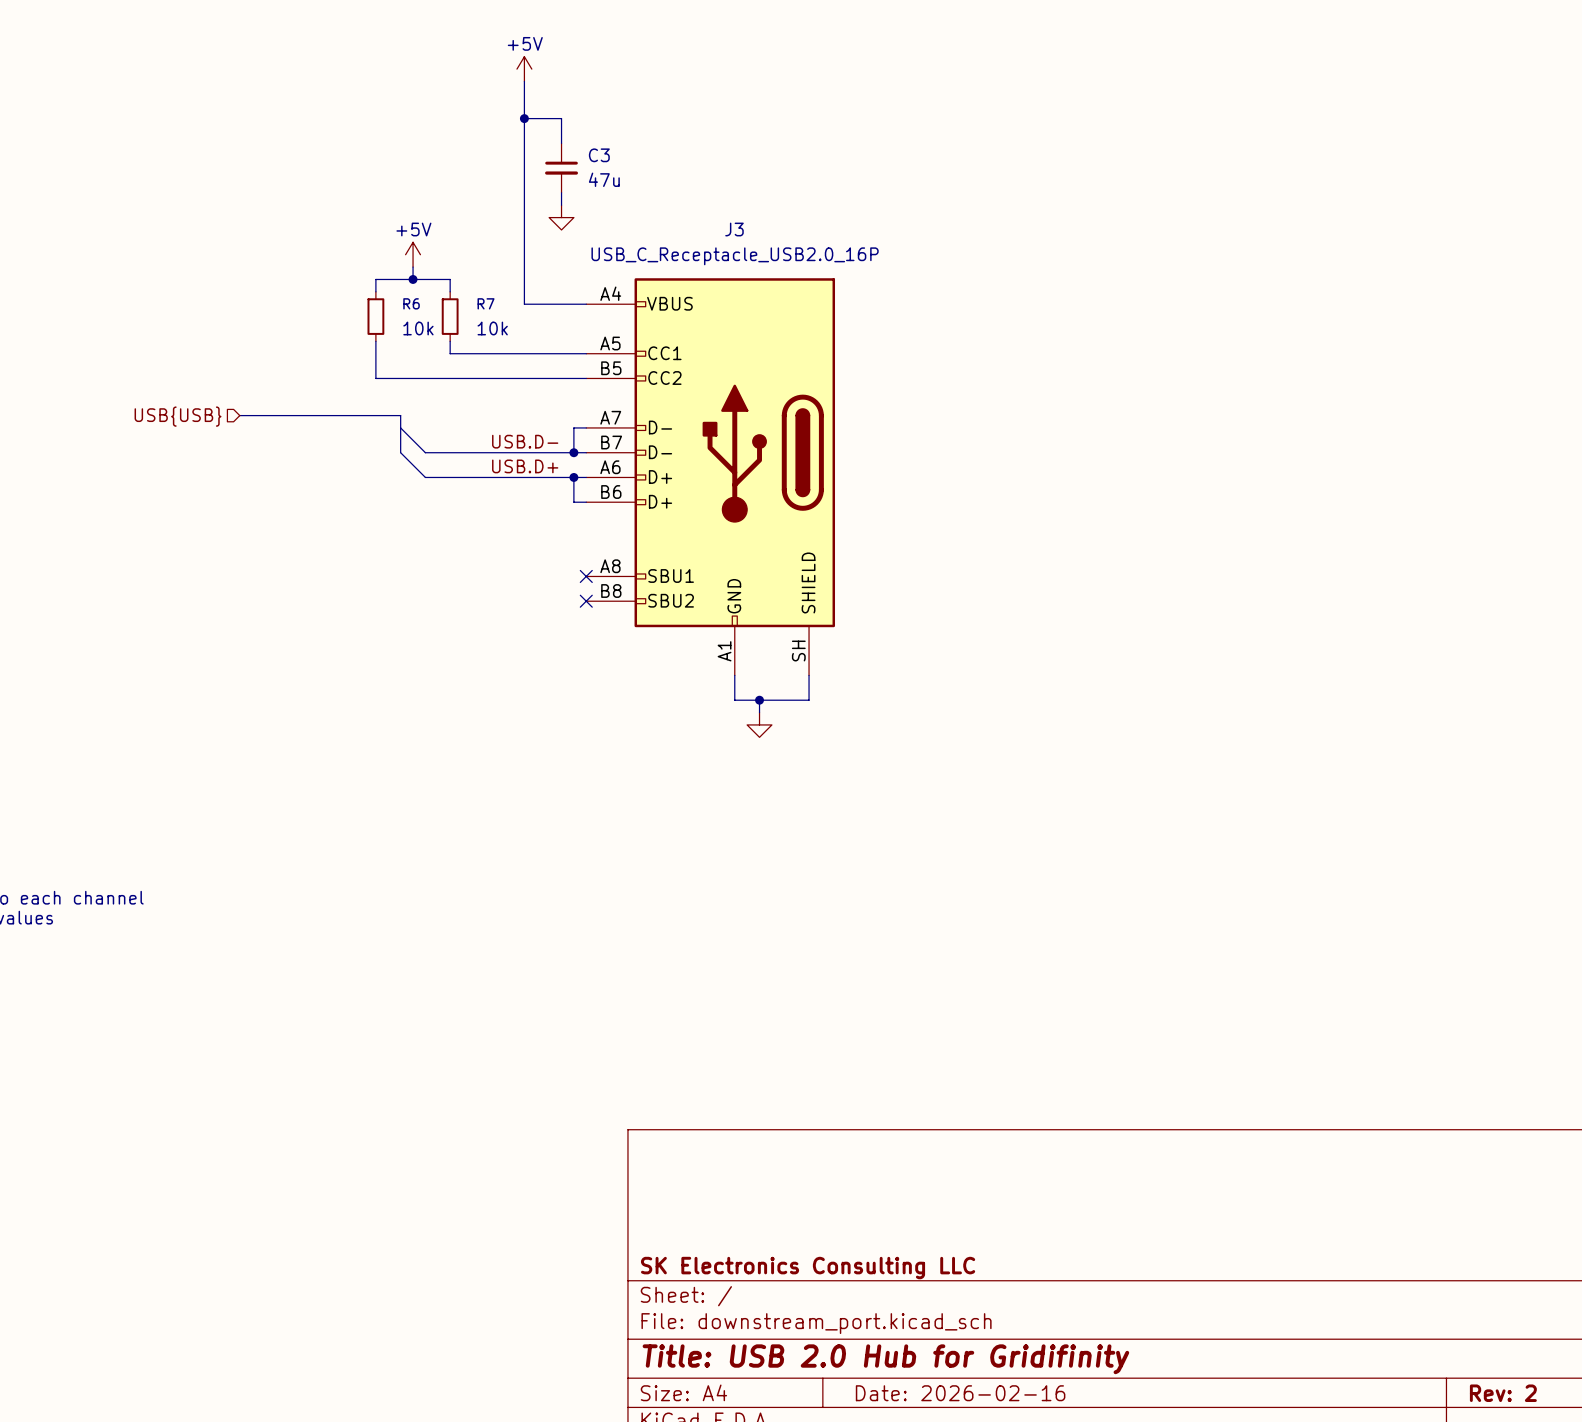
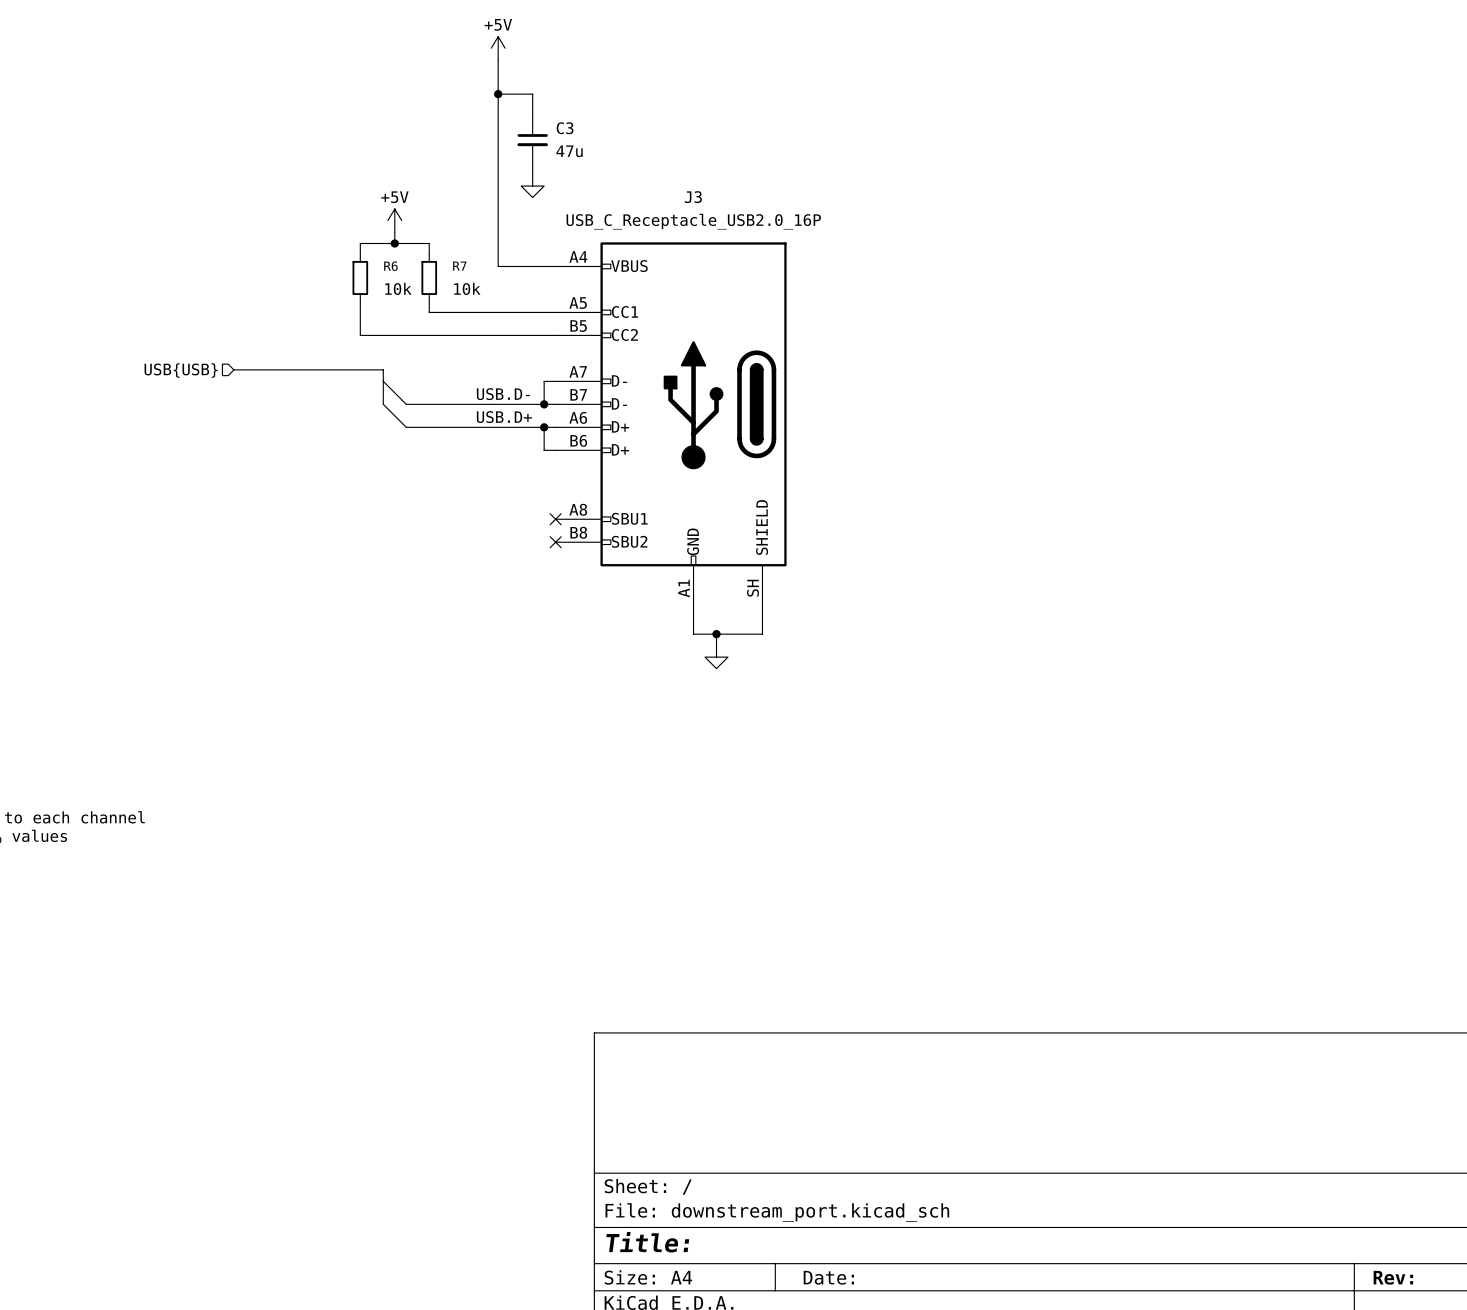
title block: SK Electronics Consulting LLC (808, 1268) -> none
title block: Title: USB 2.0 Hub for Gridifinity (885, 1359) -> Title: (647, 1242)
title block: Date: 2026-02-16 (960, 1393) -> Date: (828, 1277)
title block: Rev: 2 (1503, 1393) -> Rev: (1393, 1277)

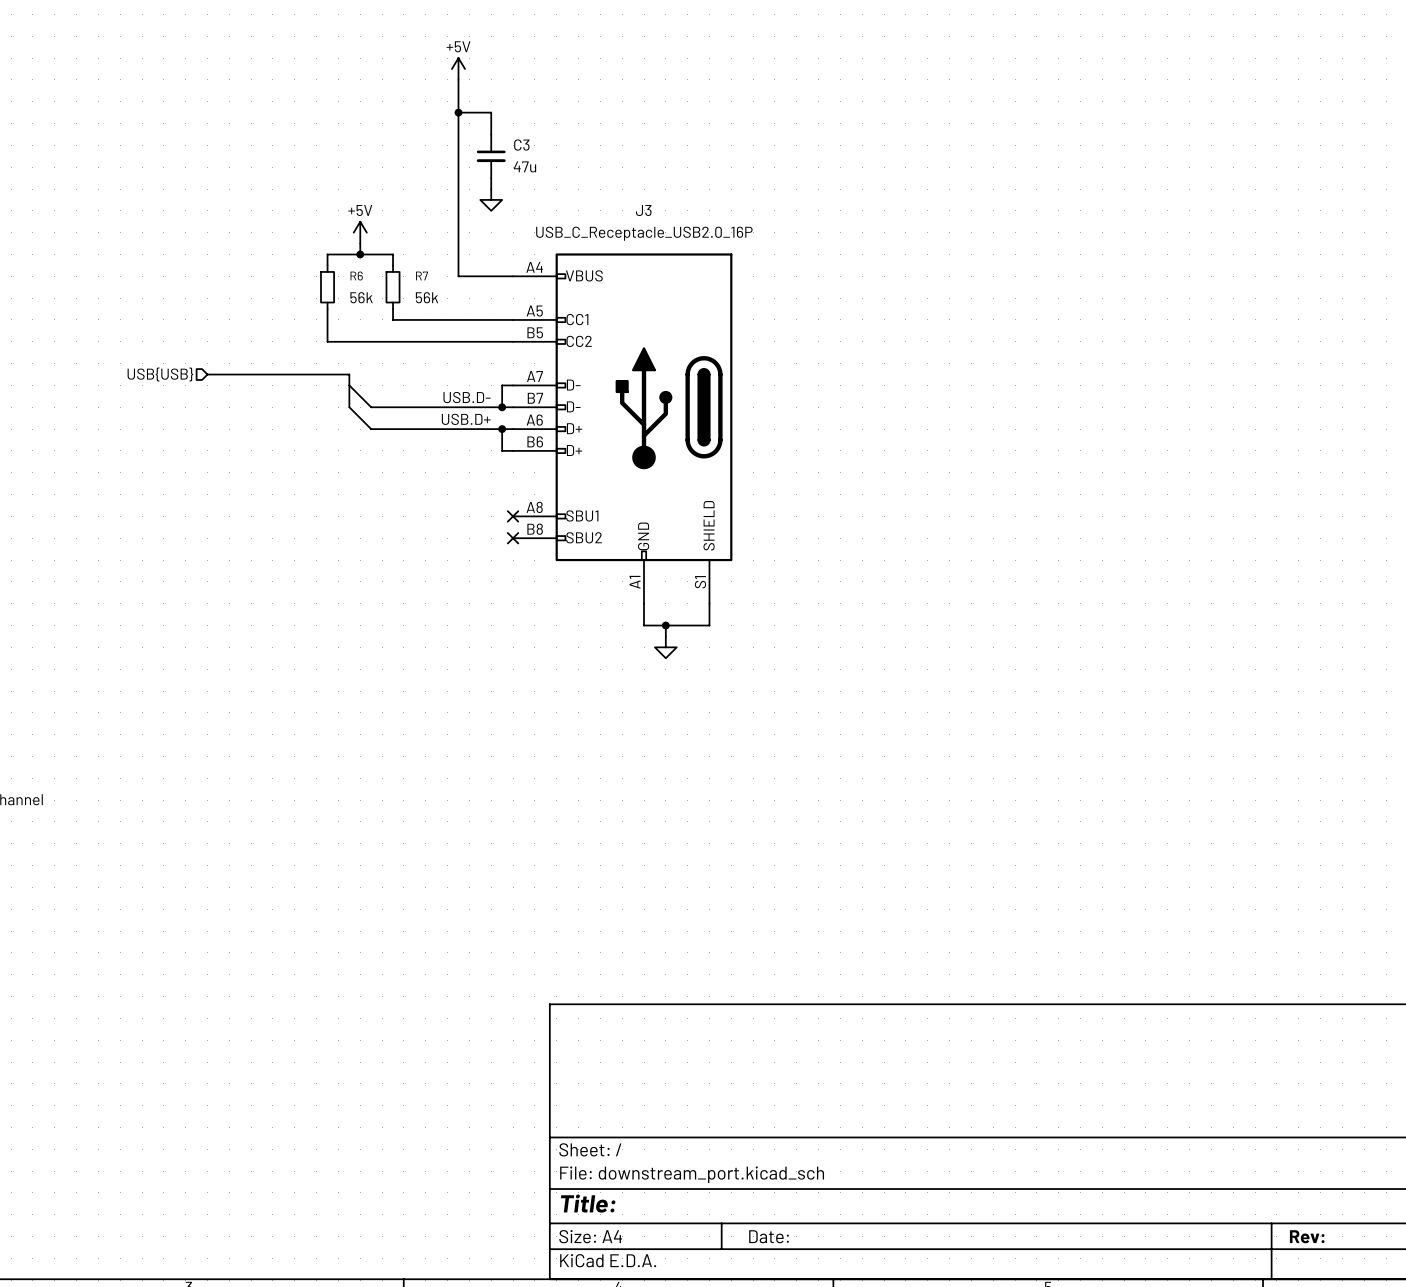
R6 value: 10k (398, 288) -> 56k (361, 297)
R7 value: 10k (467, 288) -> 56k (427, 297)
J3 pin number: SH (753, 588) -> S1 (700, 582)

